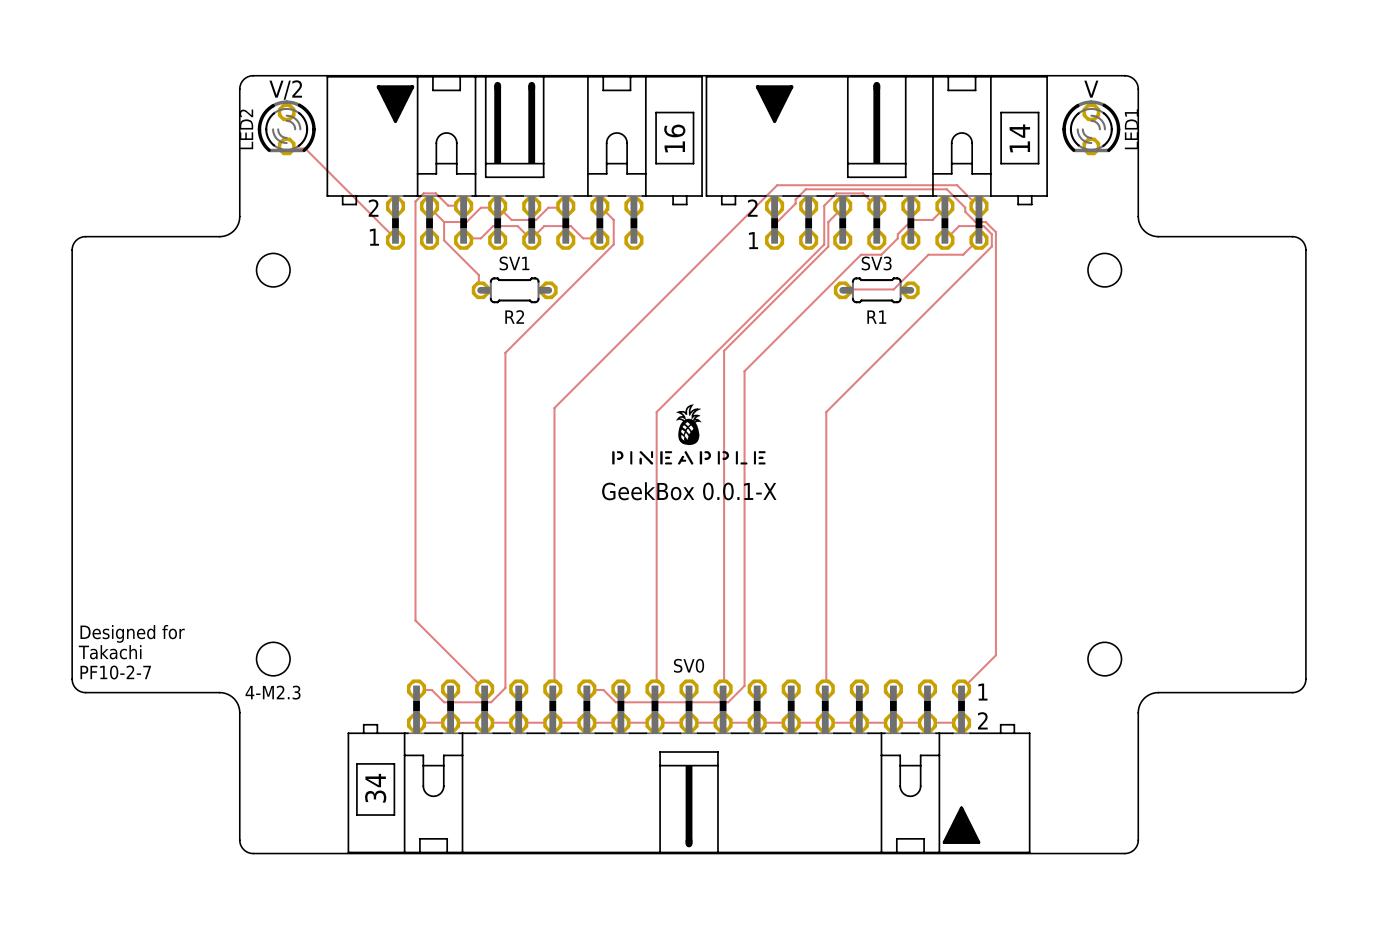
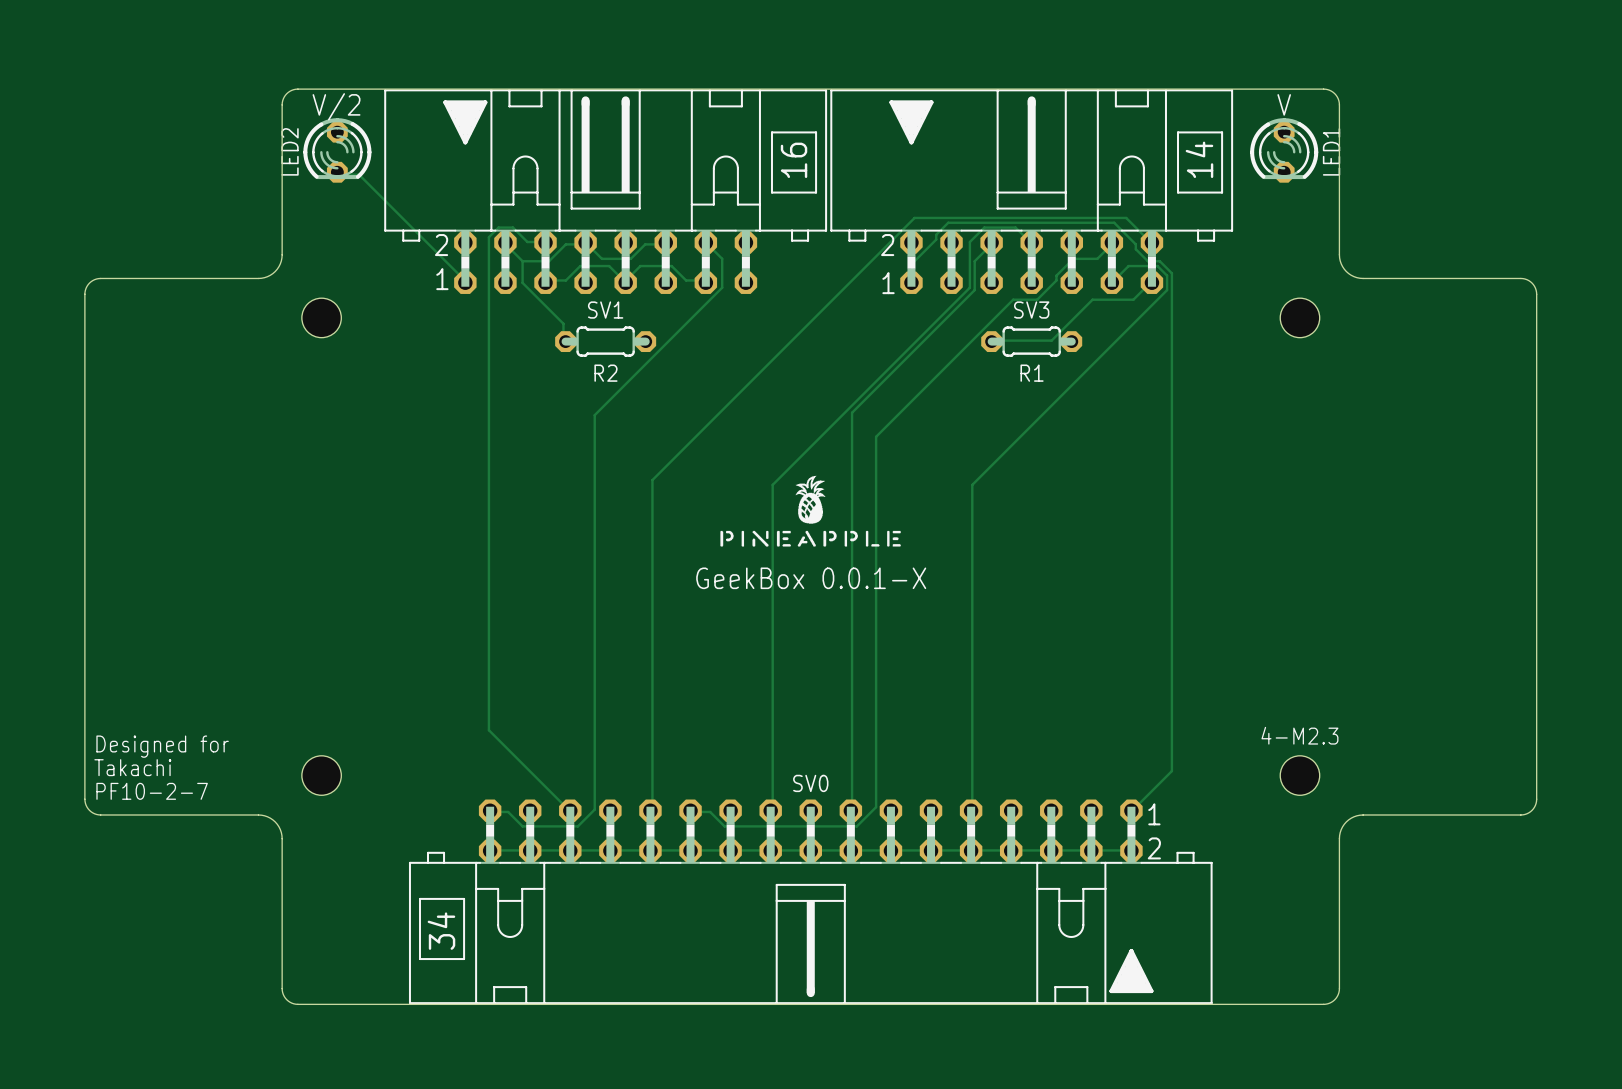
text: none -> 4-M2.3 (1299, 735)
text: 4-M2.3 (273, 692) -> none

